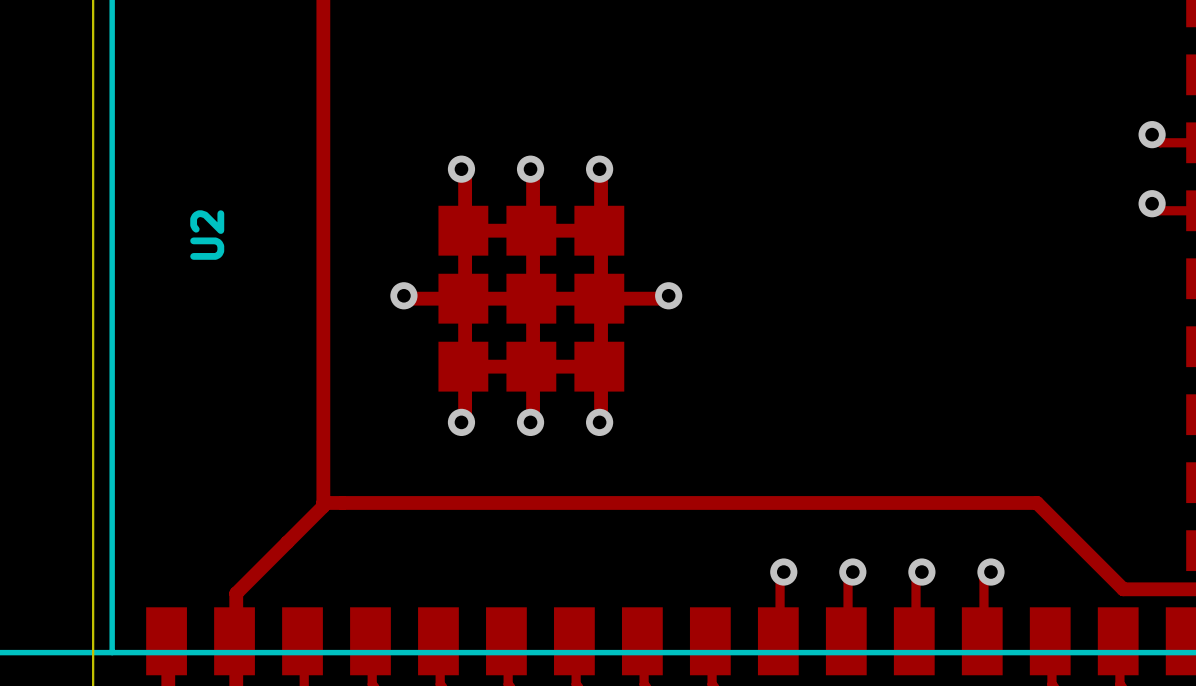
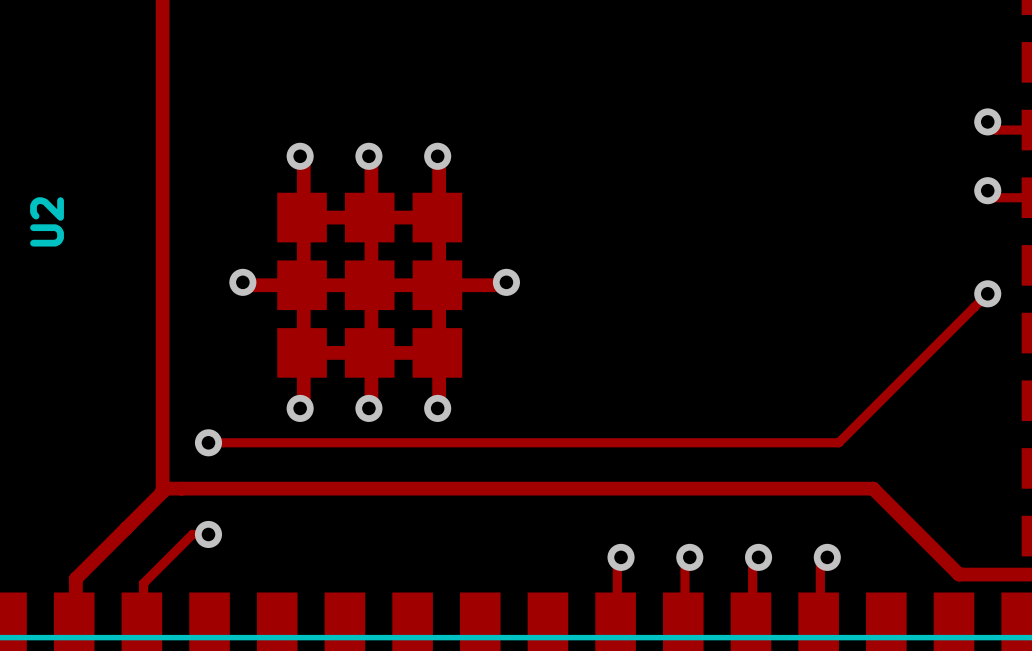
track: none -> (987, 293) (838, 442) (208, 442)
via: none -> (987, 293)
via: none -> (208, 442)
track: none -> (208, 534) (192, 534) (143, 583) (143, 626)
via: none -> (208, 534)

